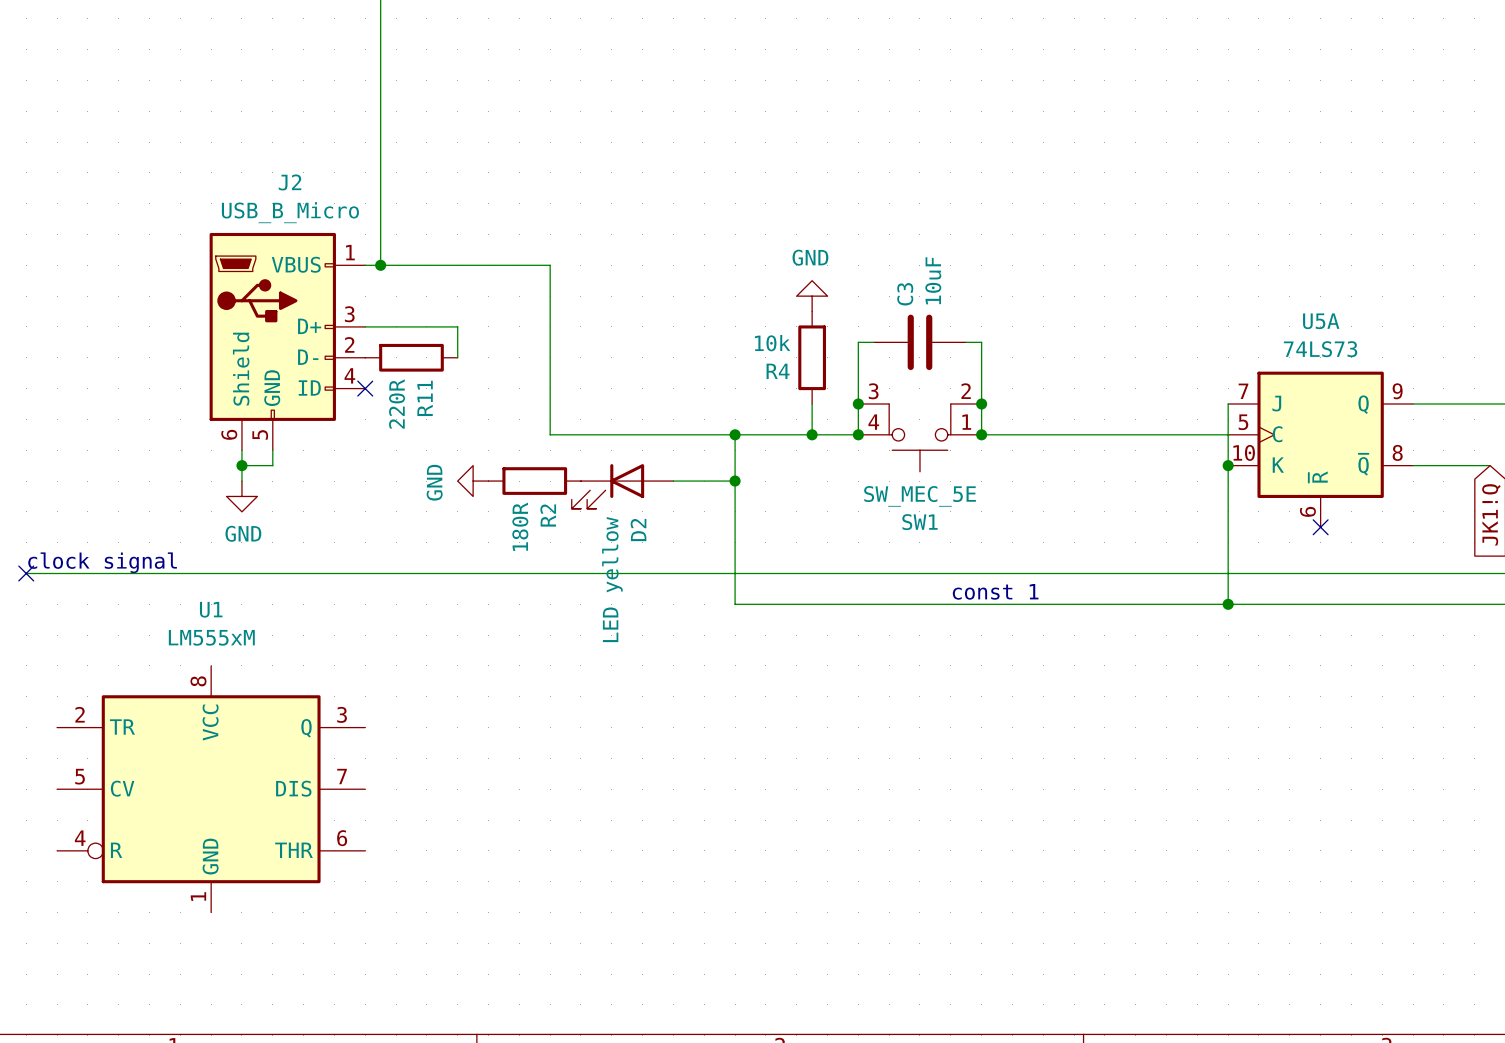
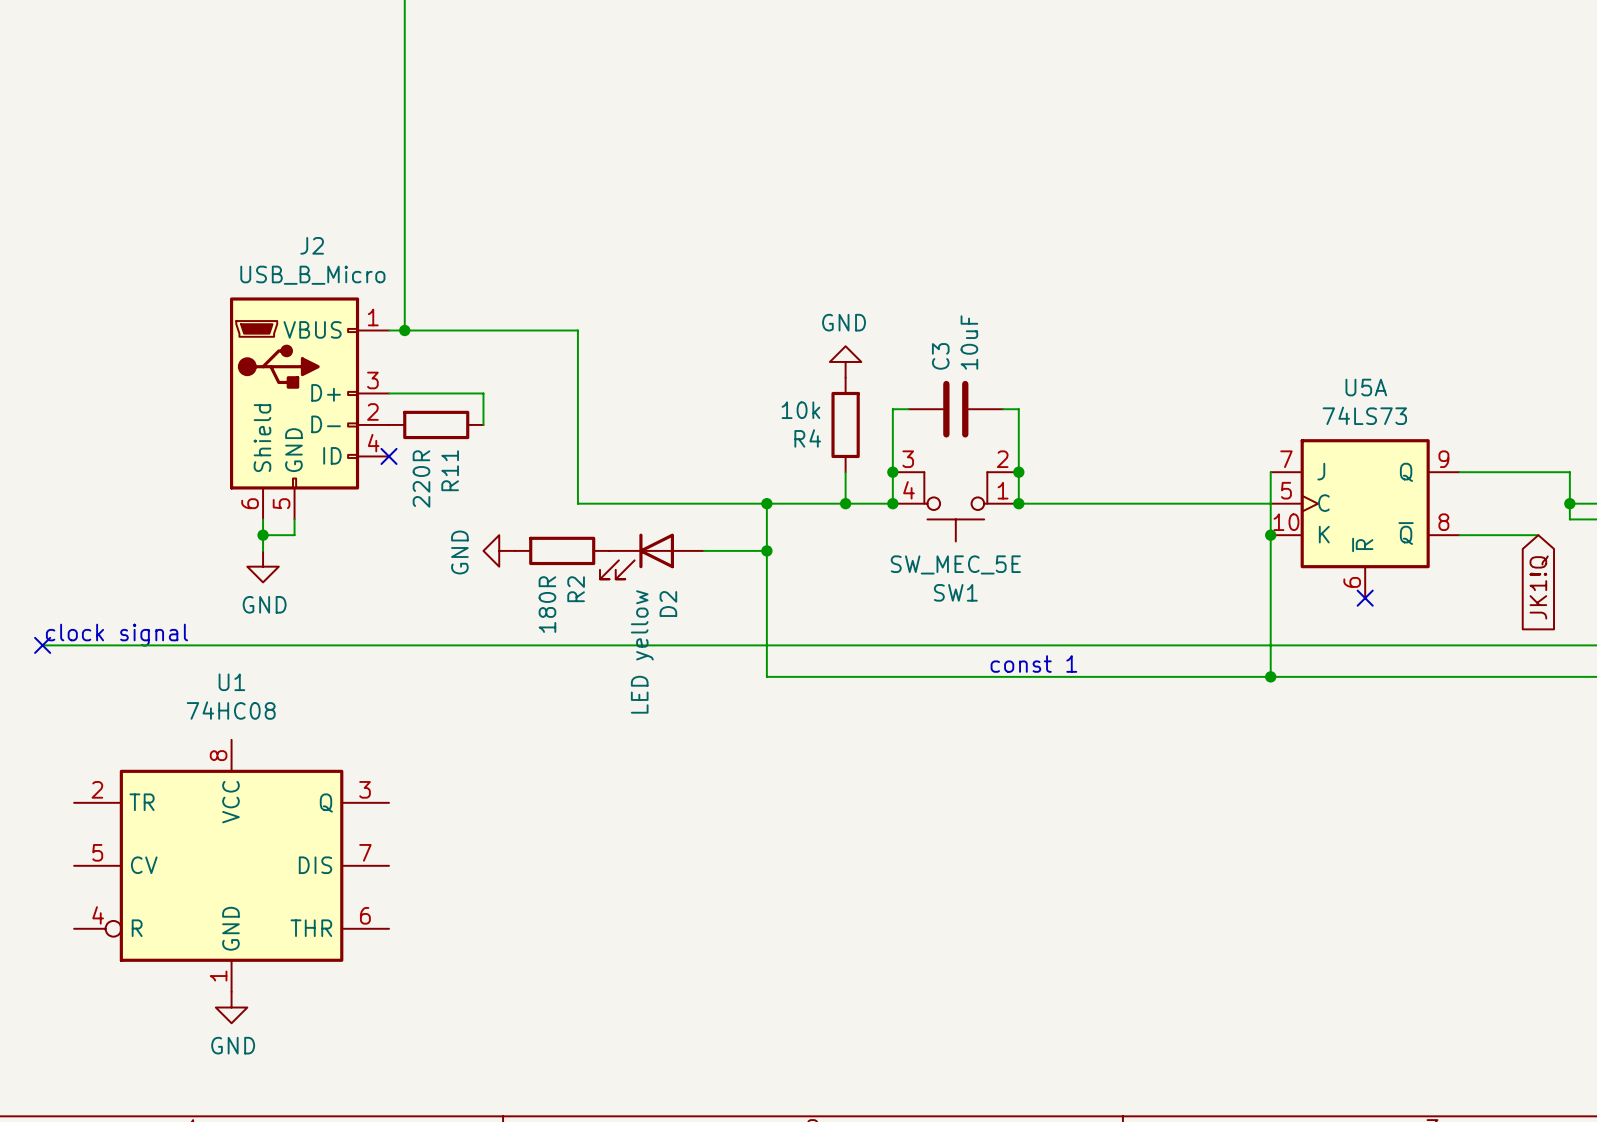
U1 value: LM555xM (211, 637) -> 74HC08 (231, 710)
power symbol: none -> GND (231, 1007)

